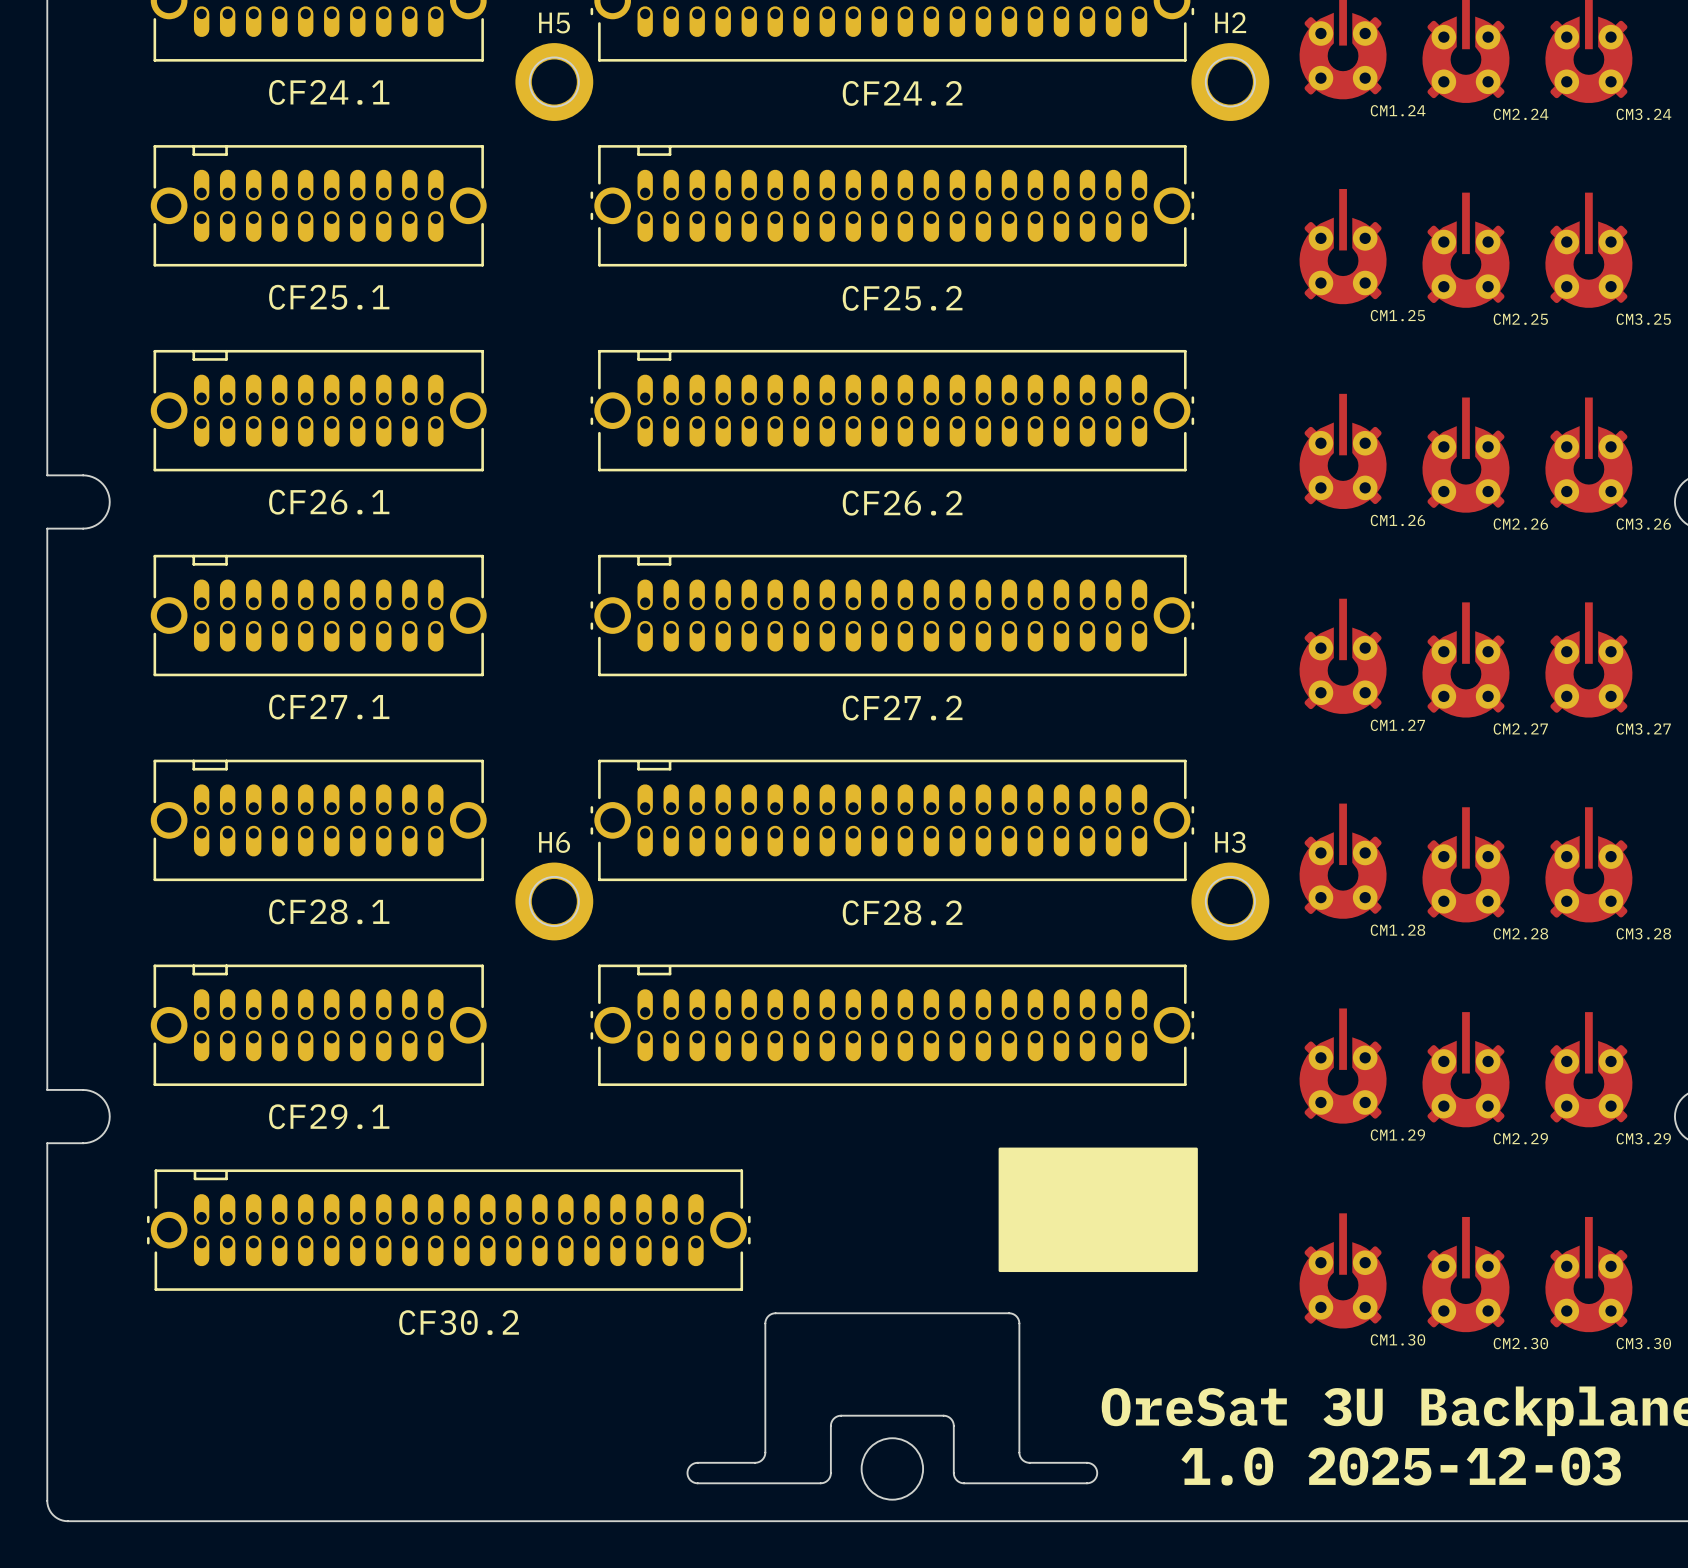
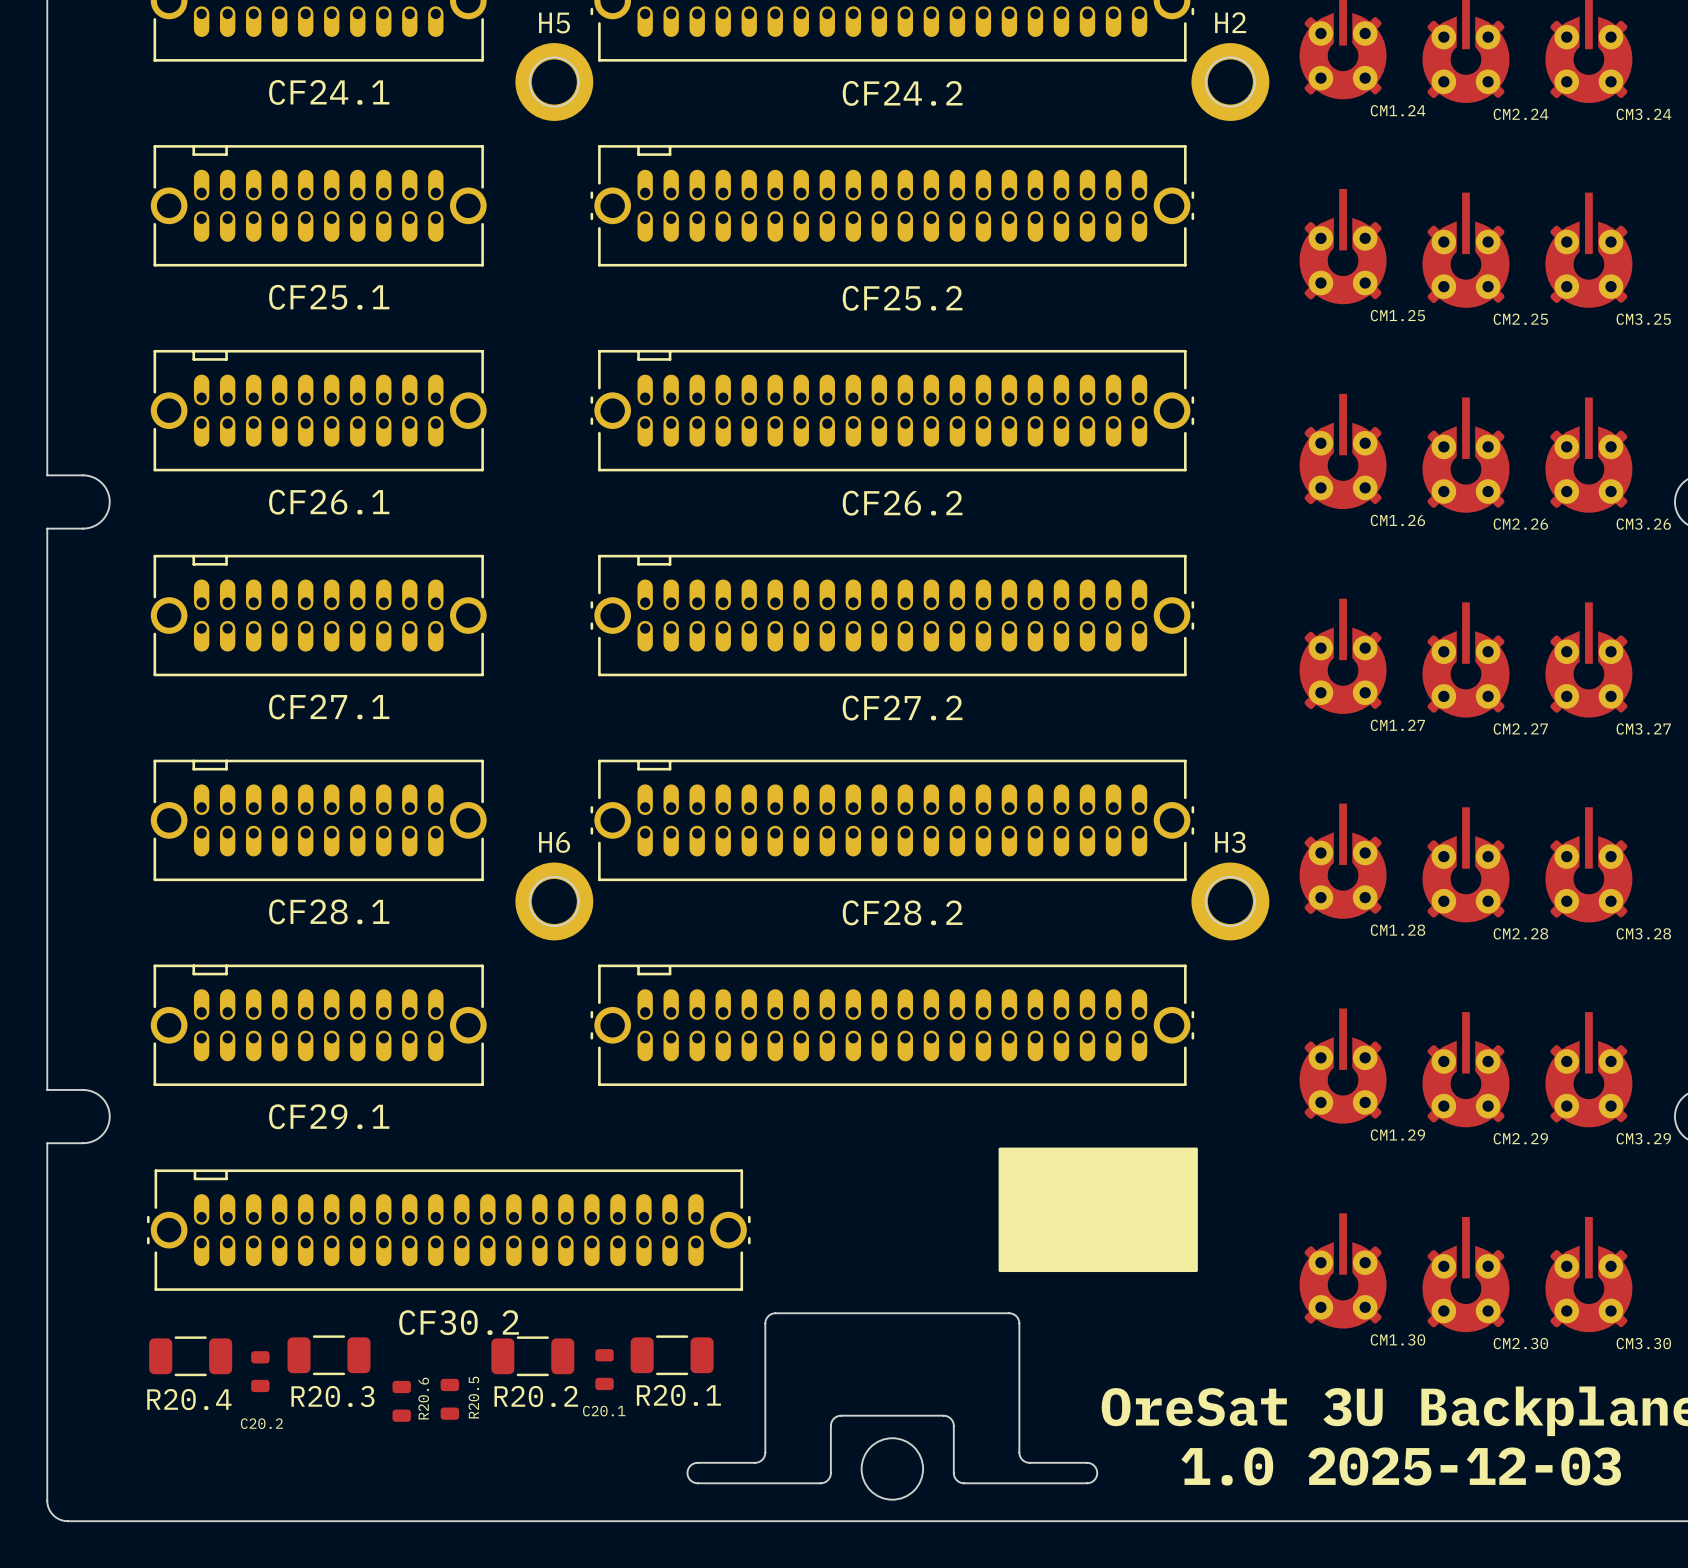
R20.3: none -> (328, 1355)
R20.1: none -> (672, 1355)
R20.4: none -> (190, 1356)
R20.2: none -> (532, 1356)
C20.1: none -> (604, 1369)
C20.2: none -> (260, 1371)
R20.5: none -> (449, 1399)
R20.6: none -> (401, 1401)

